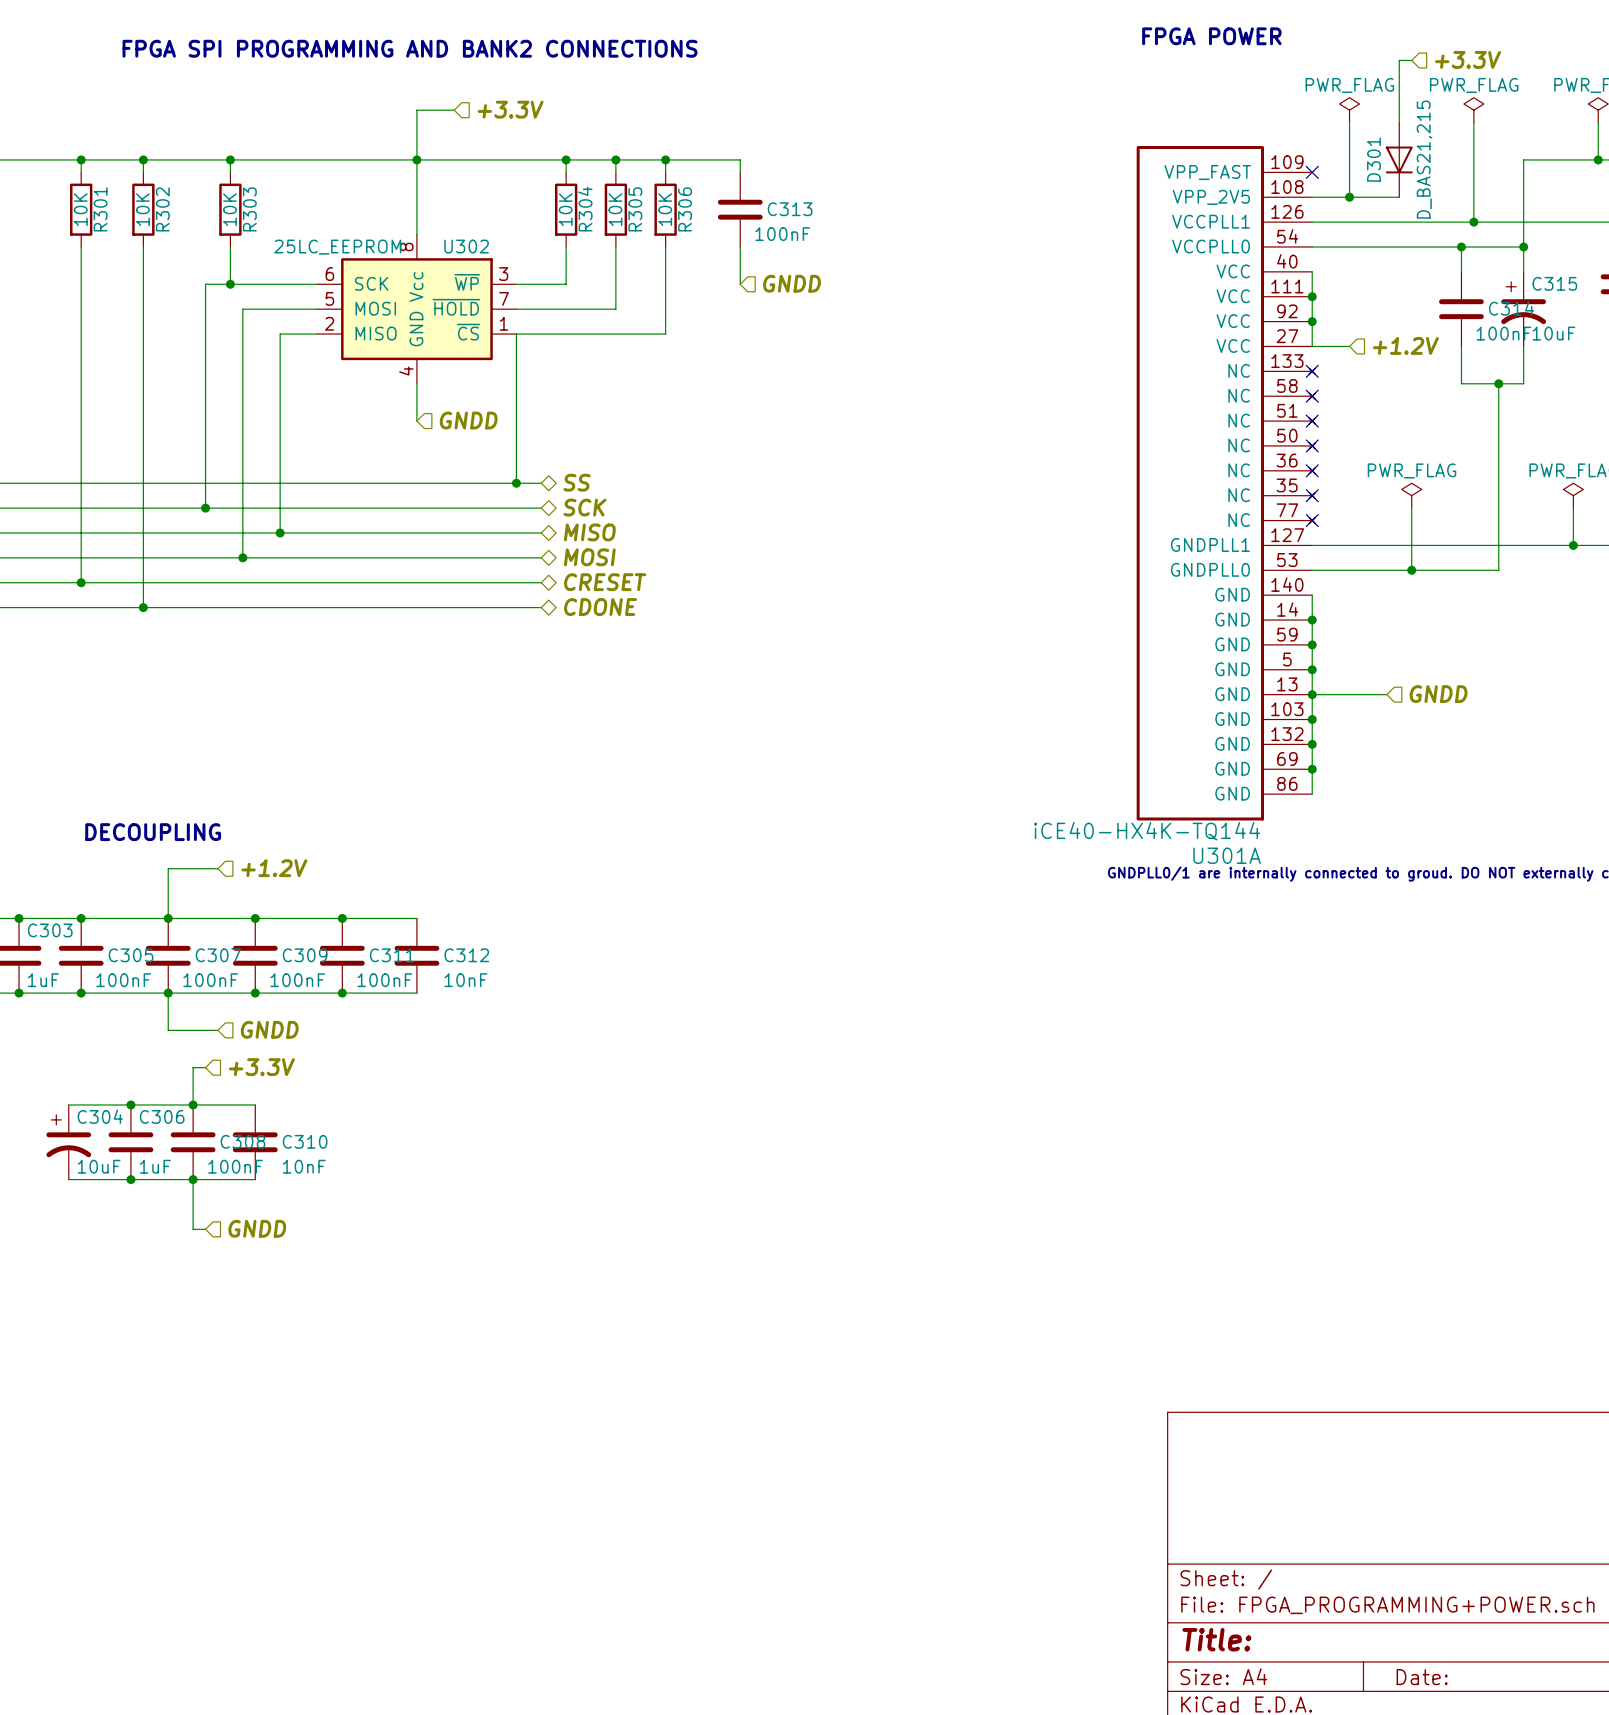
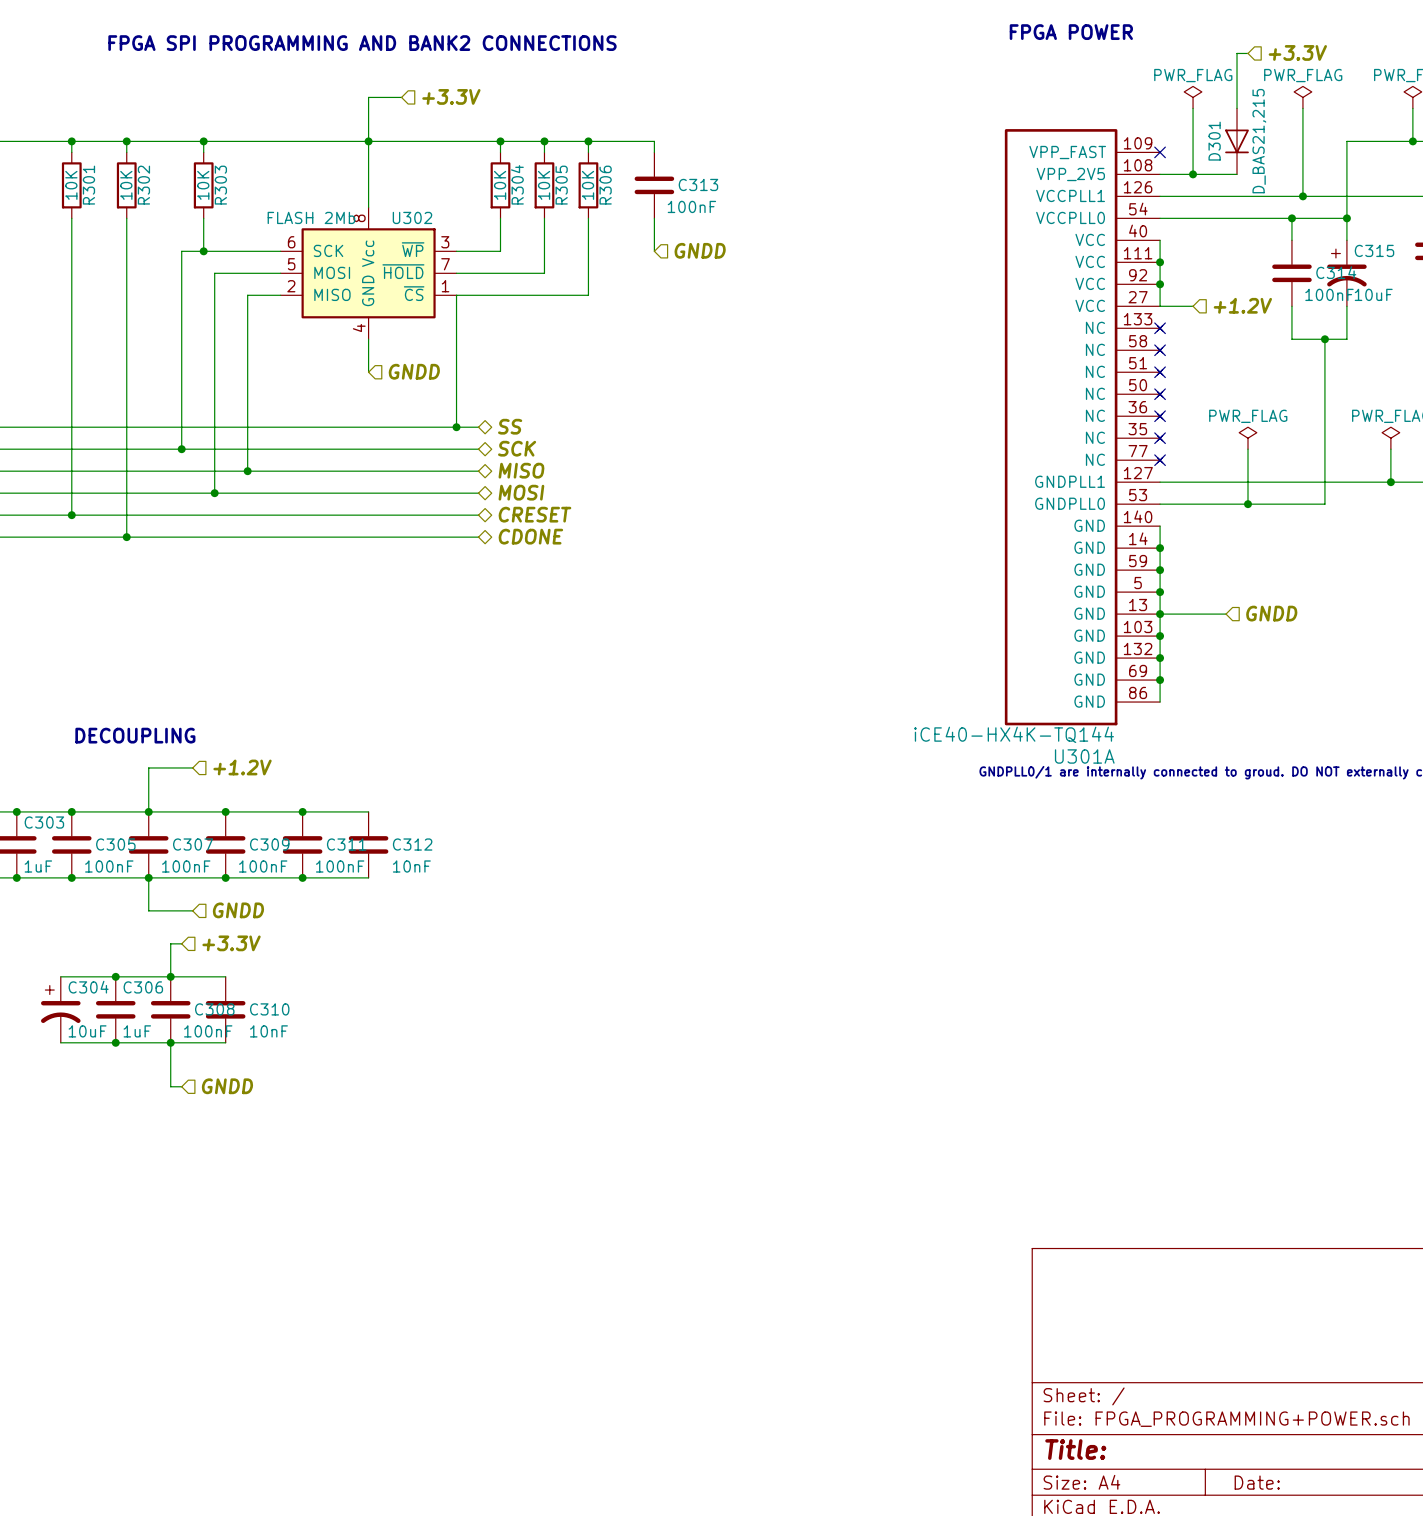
U302 value: 25LC_EEPROM (337, 247) -> FLASH 2Mb (311, 217)

